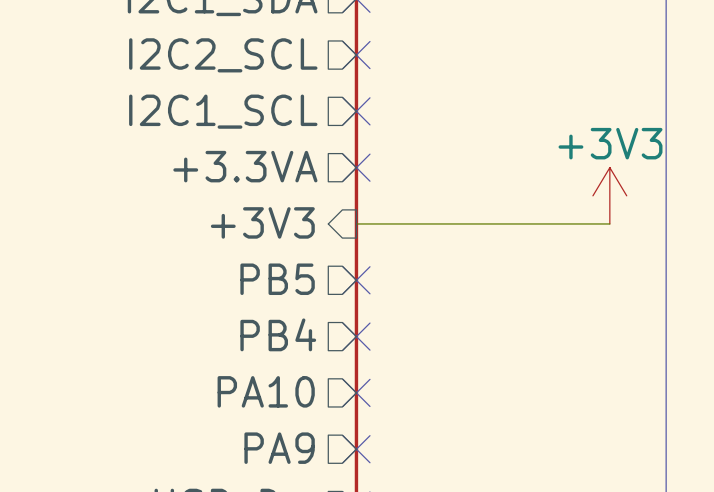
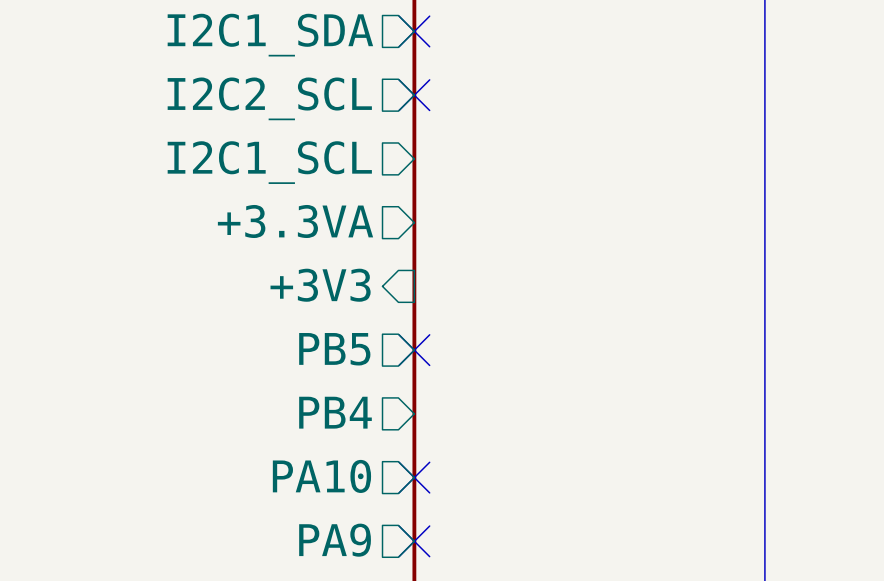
no-connect mark: (356, 111) -> none
no-connect mark: (356, 167) -> none
power symbol: +3V3 (609, 195) -> none
wire: (356, 223) (609, 223) -> none
no-connect mark: (356, 336) -> none

